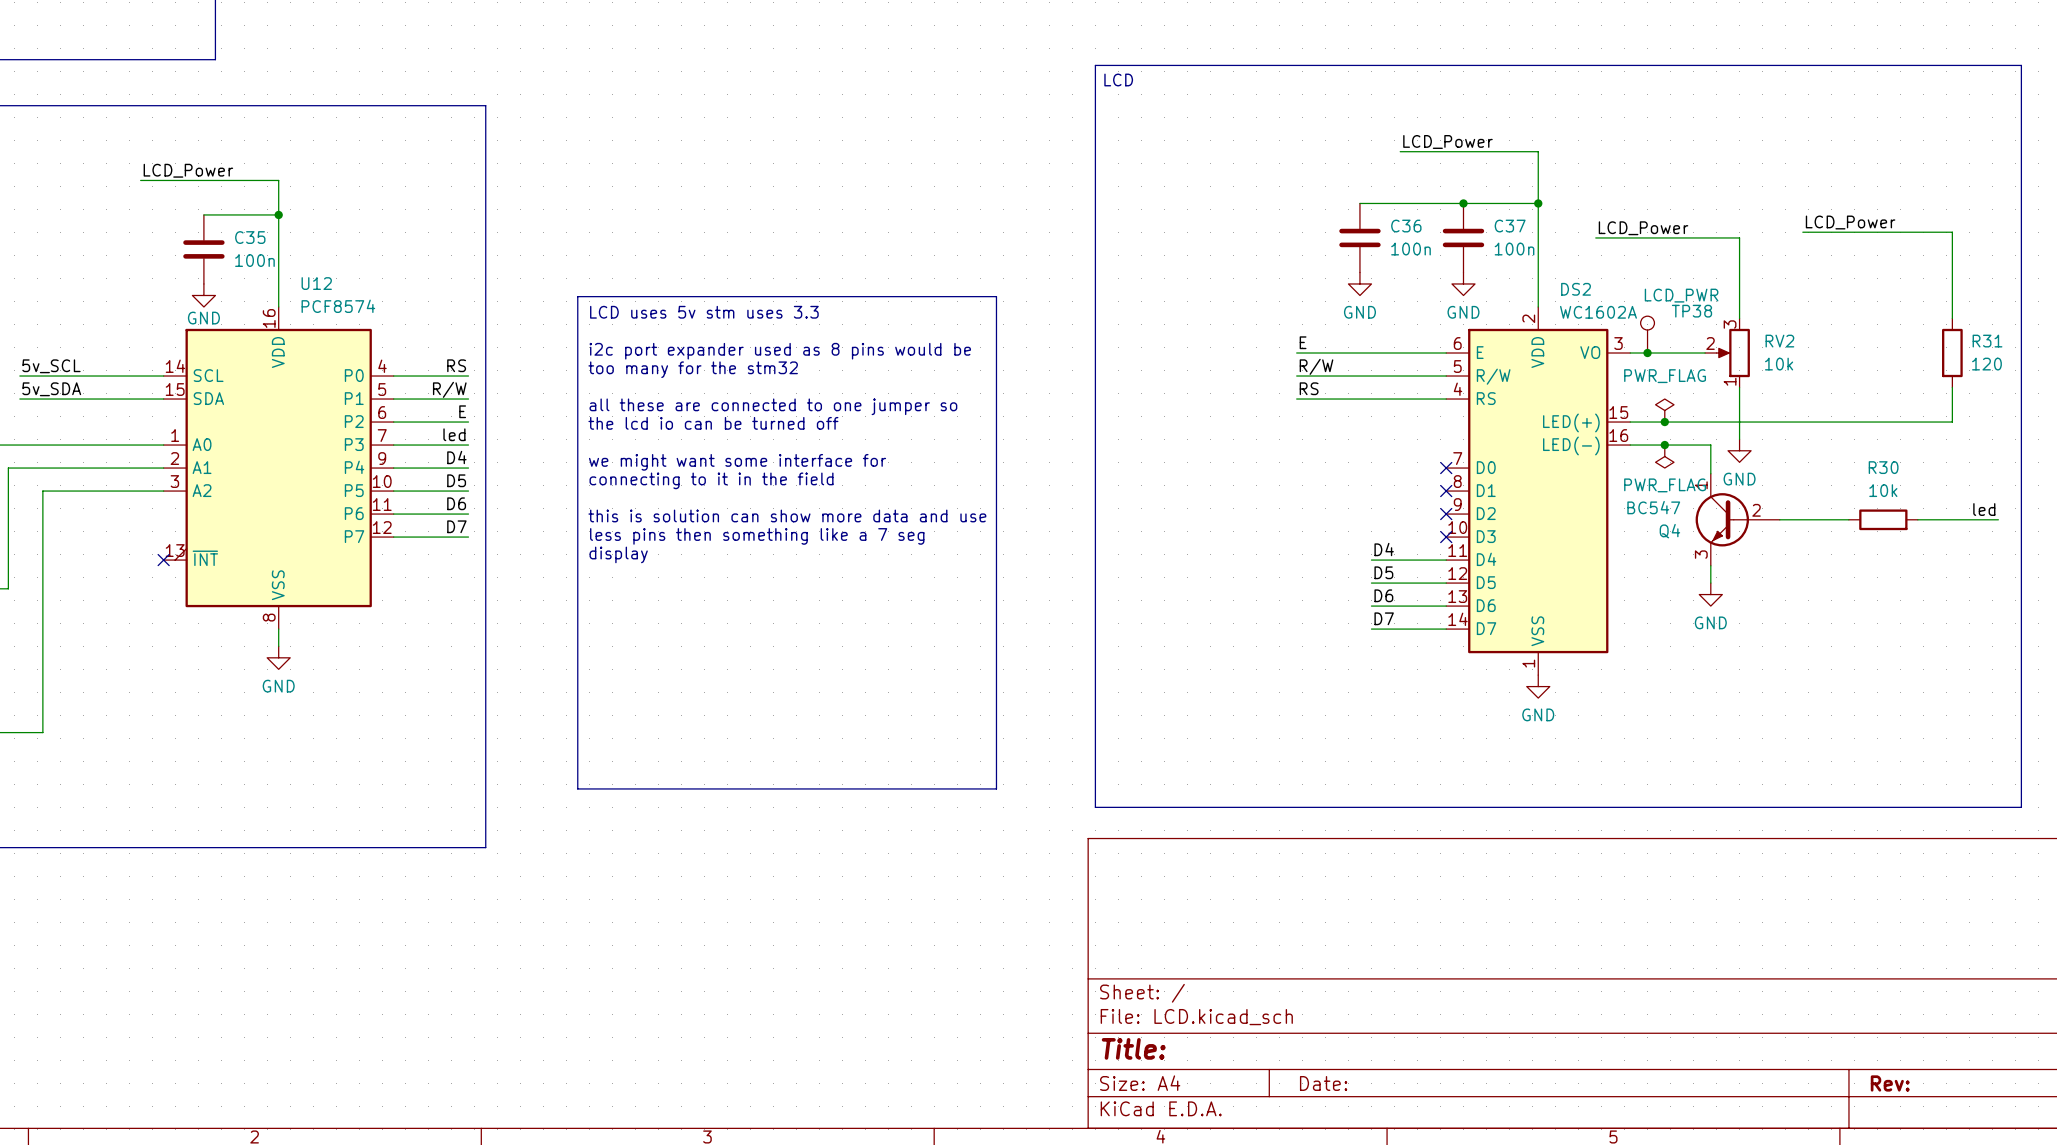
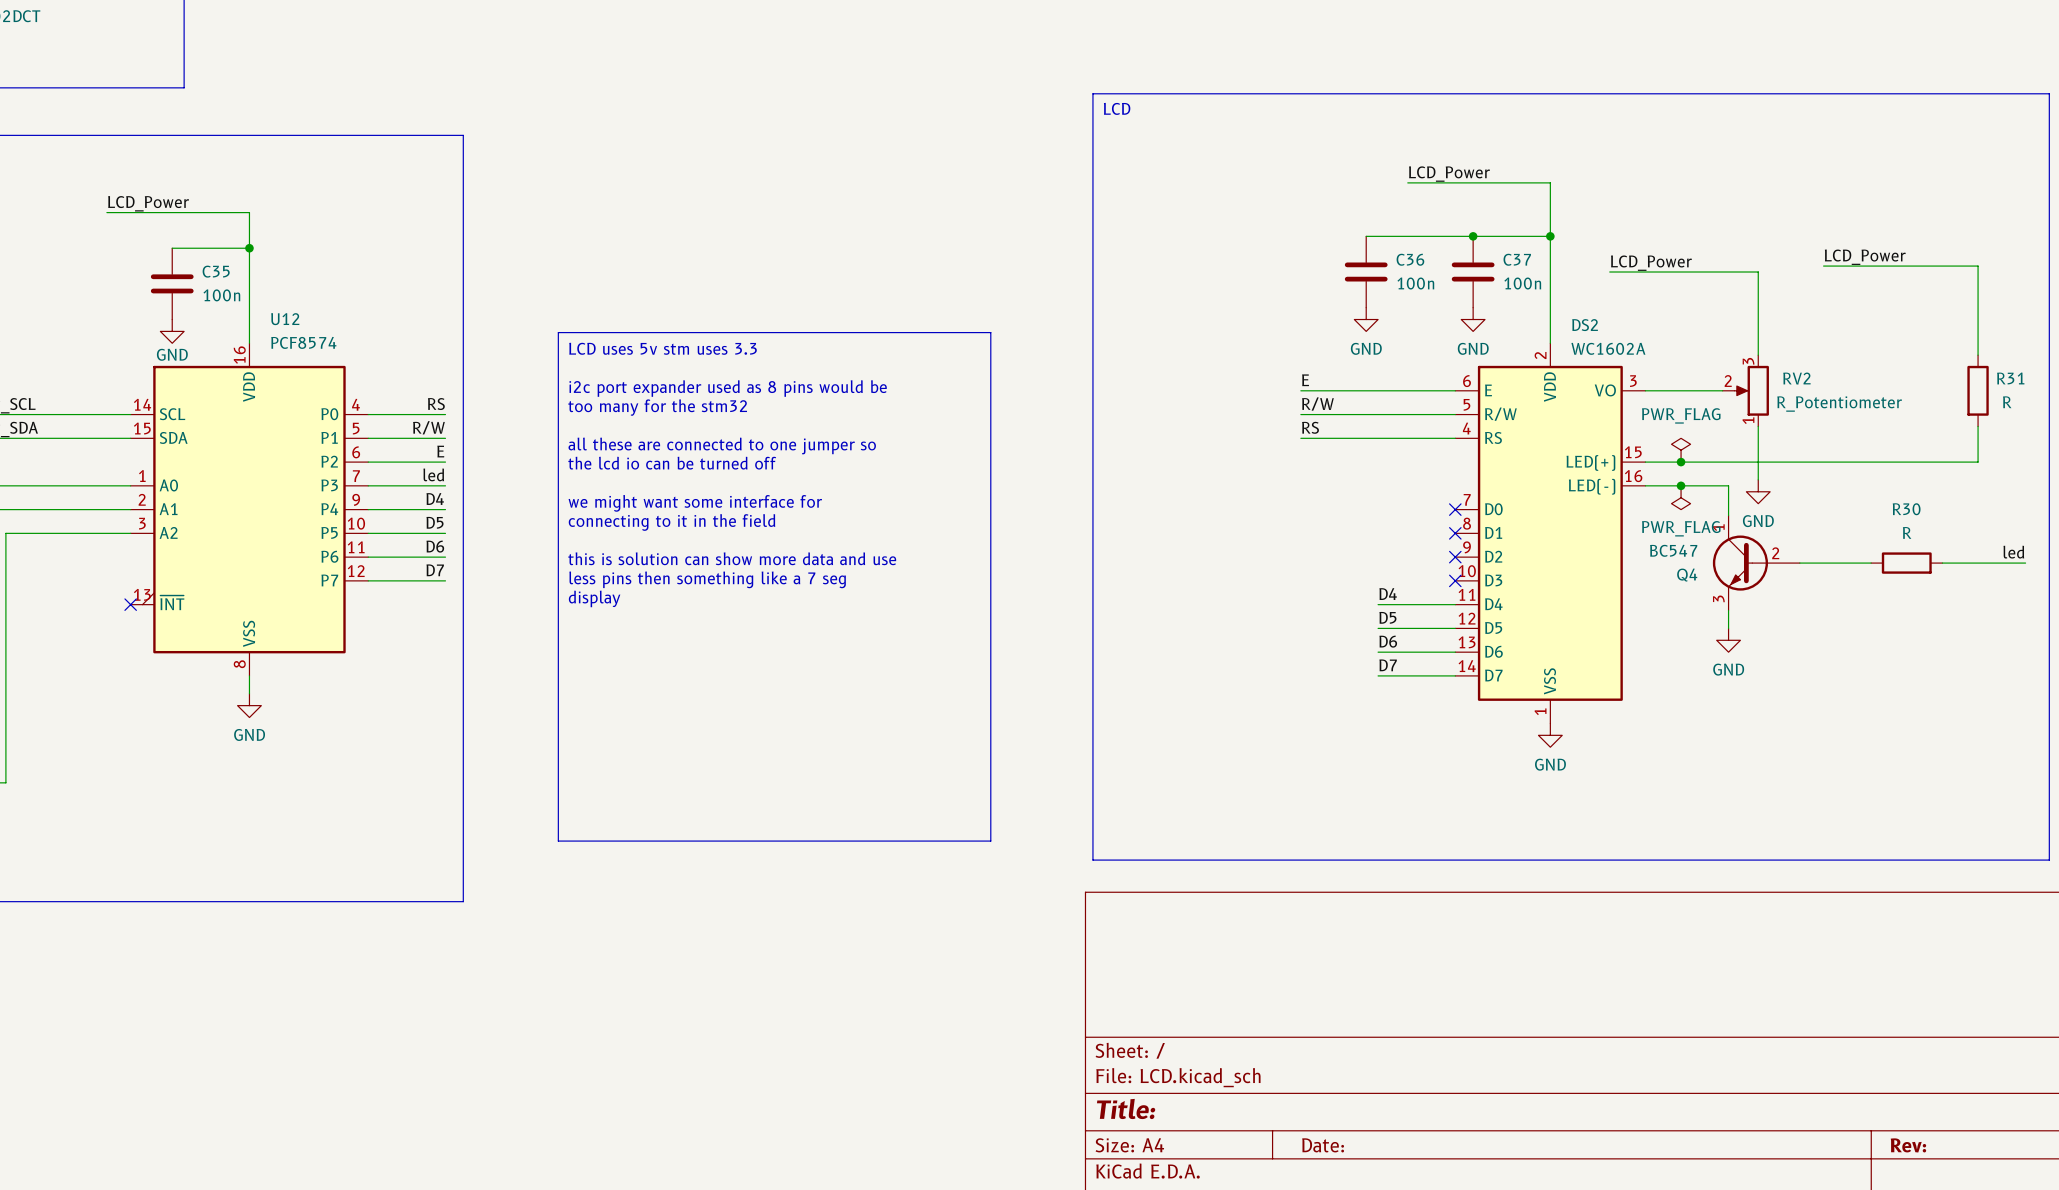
TP38: LCD_PWR (1647, 334) -> none
junction: (1647, 353) -> none
RV2 value: 10k (1779, 364) -> R_Potentiometer (1839, 404)
R31 value: 120 (1986, 364) -> R (2007, 402)
R30 value: 10k (1883, 490) -> R (1907, 532)

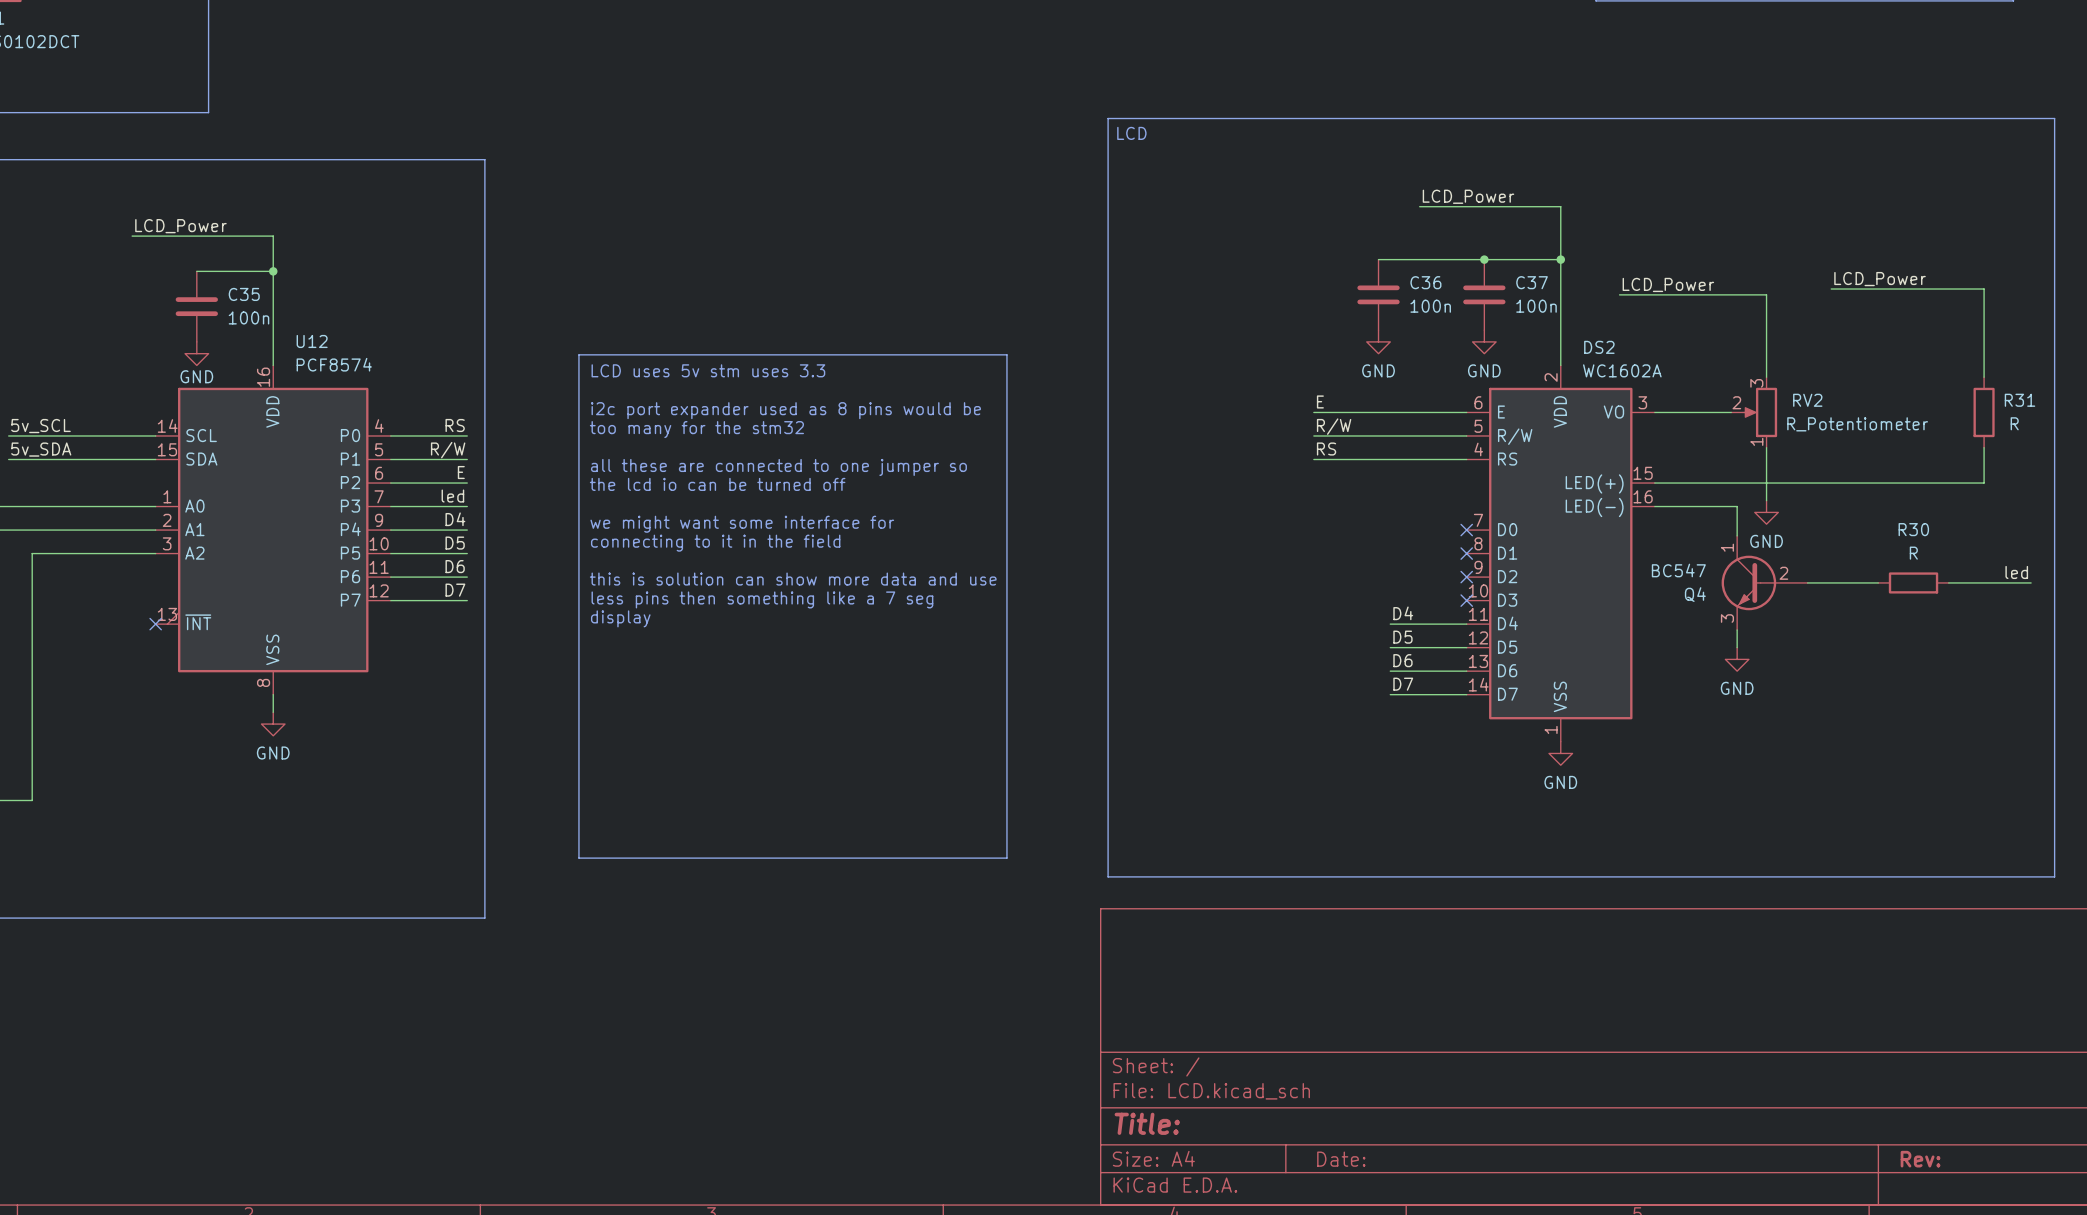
power symbol: PWR_FLAG (1681, 450) -> none
junction: (1681, 462) -> none
junction: (1681, 485) -> none
power symbol: PWR_FLAG (1681, 497) -> none

